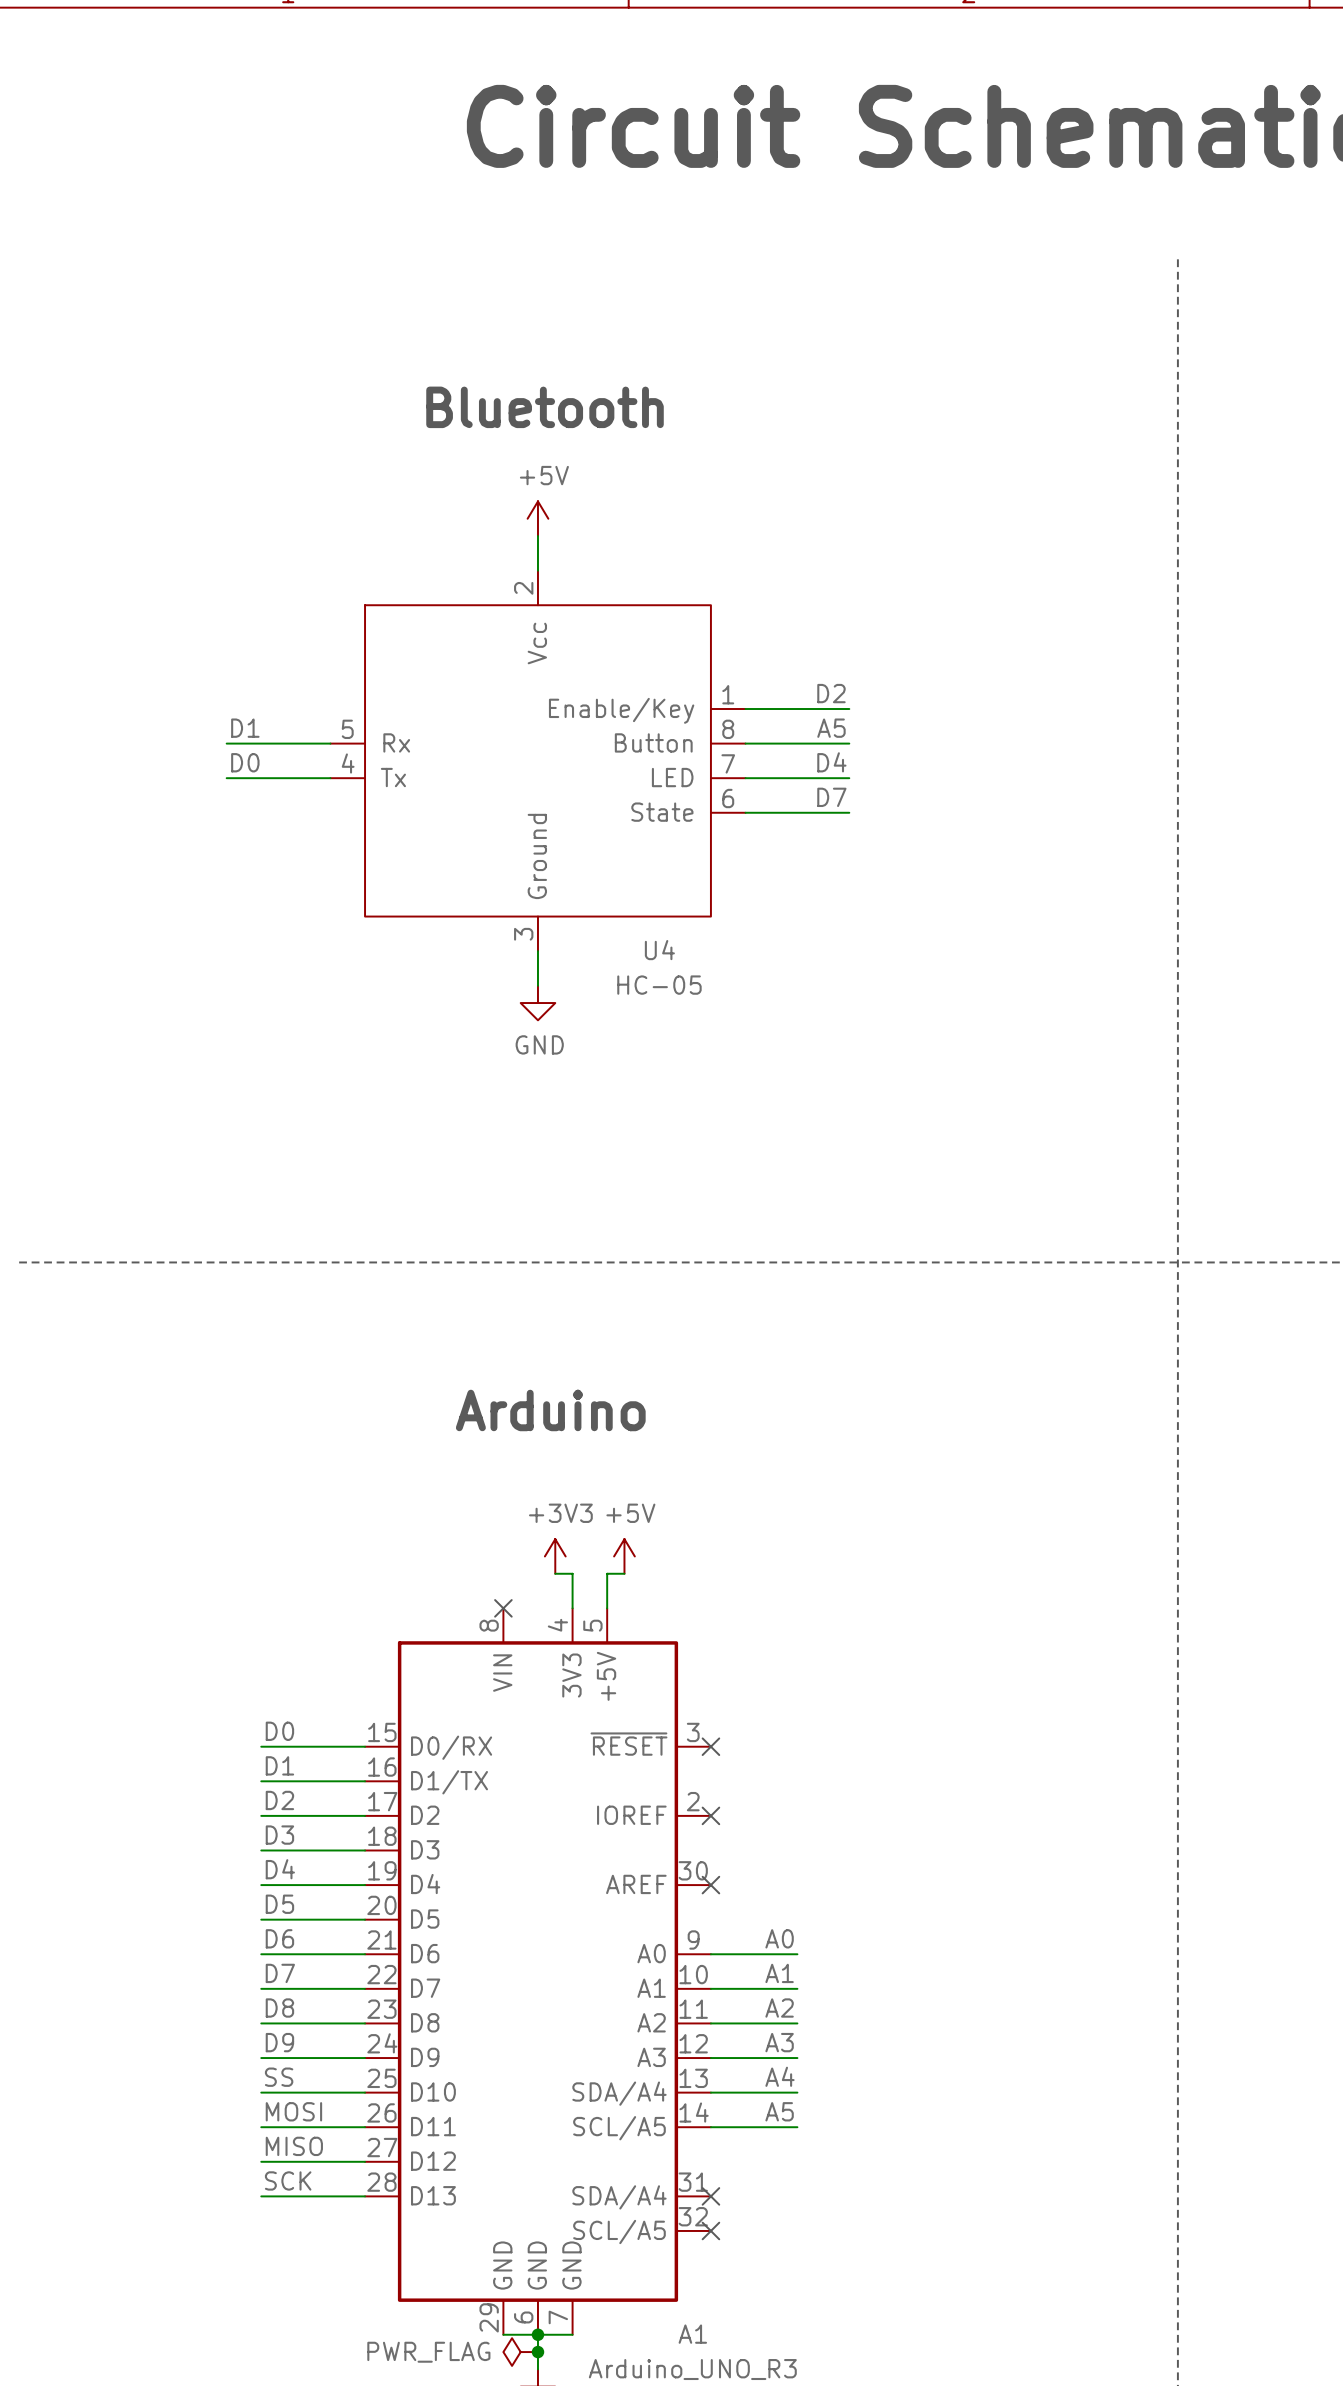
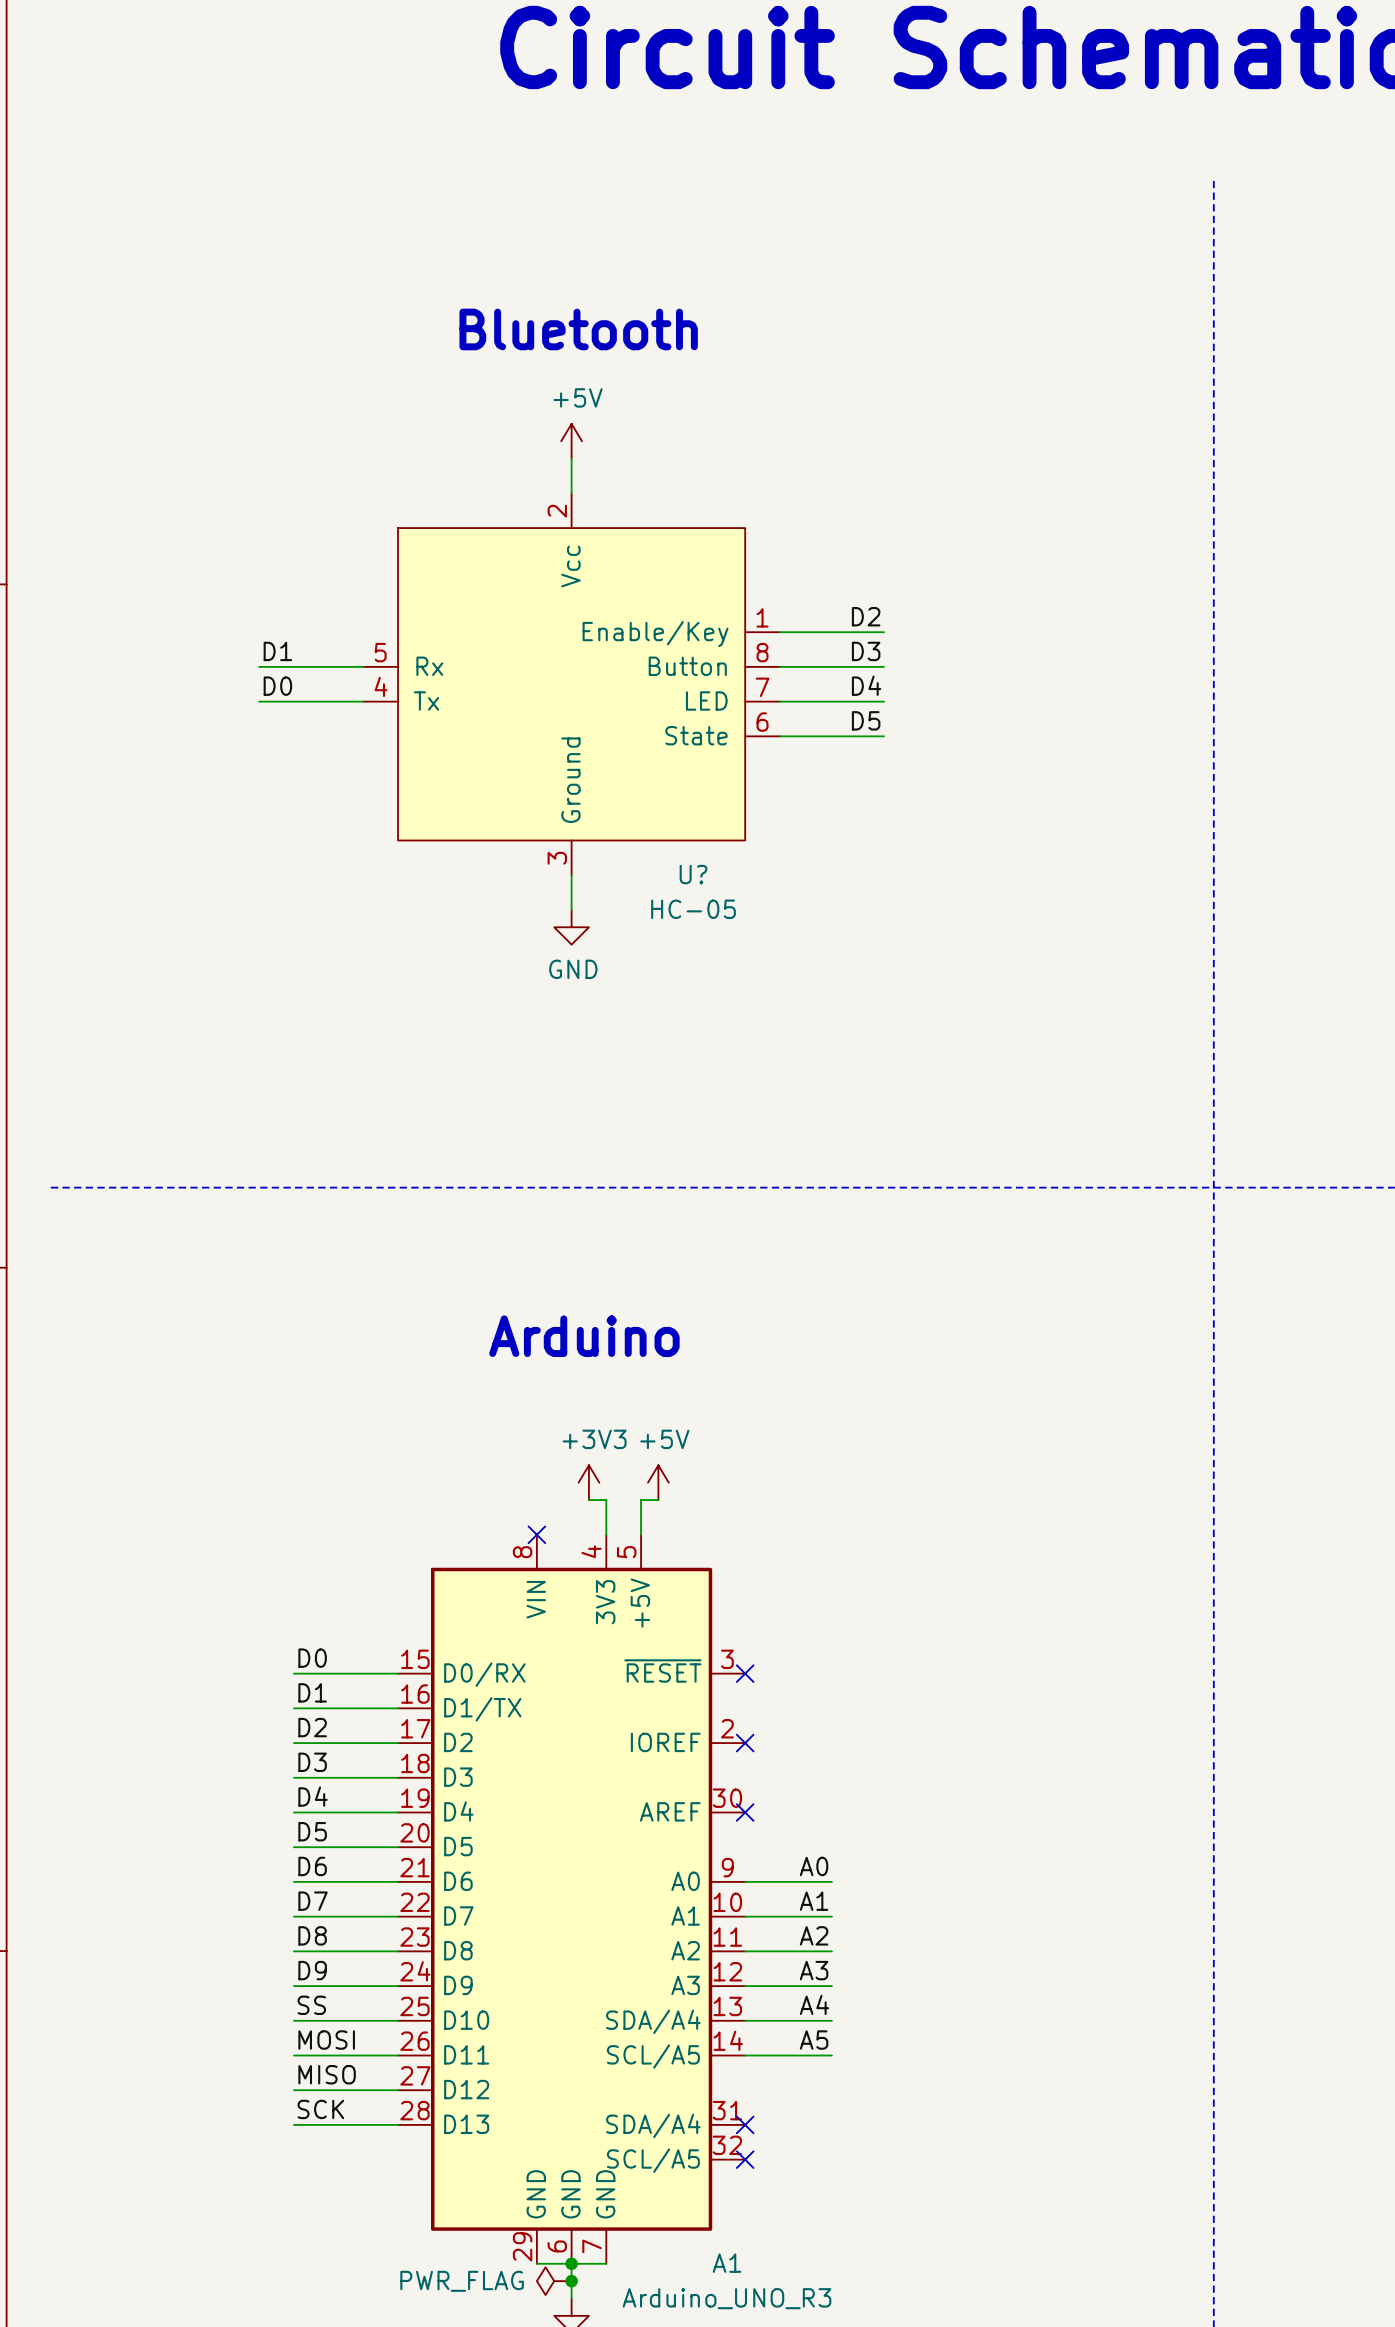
label: A5 (831, 728) -> D3 (866, 651)
label: D7 (831, 797) -> D5 (866, 720)
U4 name: U4 (659, 950) -> U? (693, 874)

